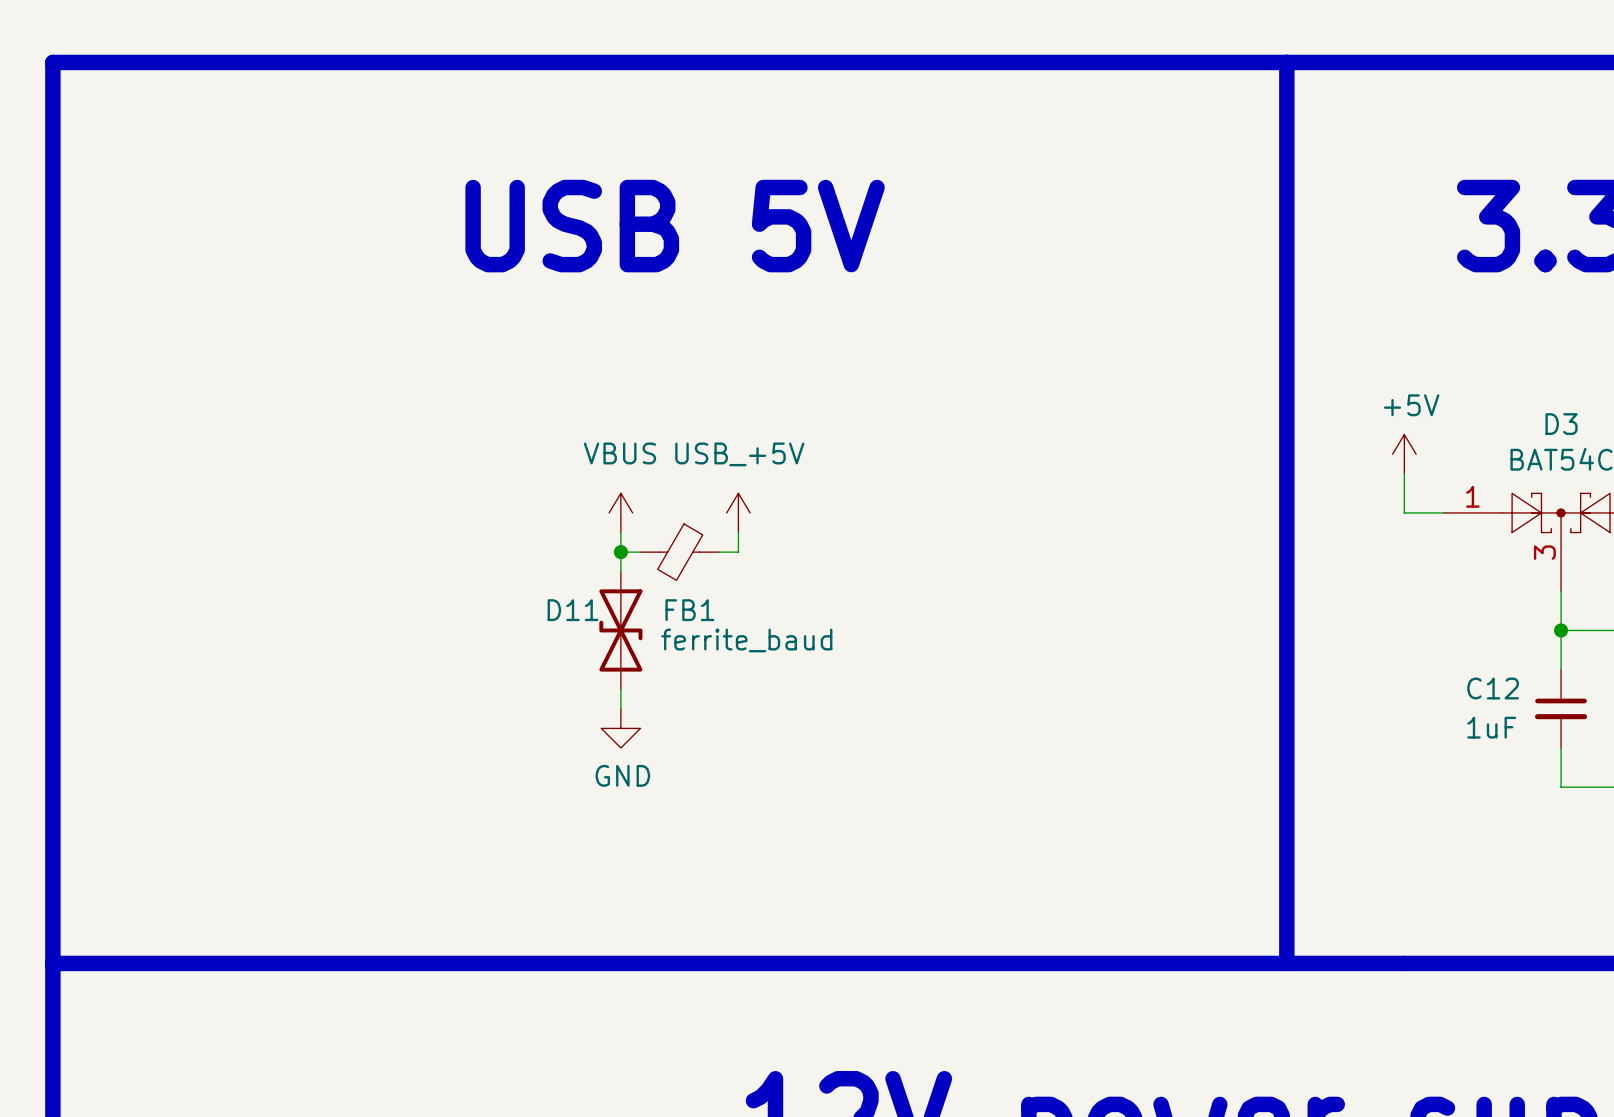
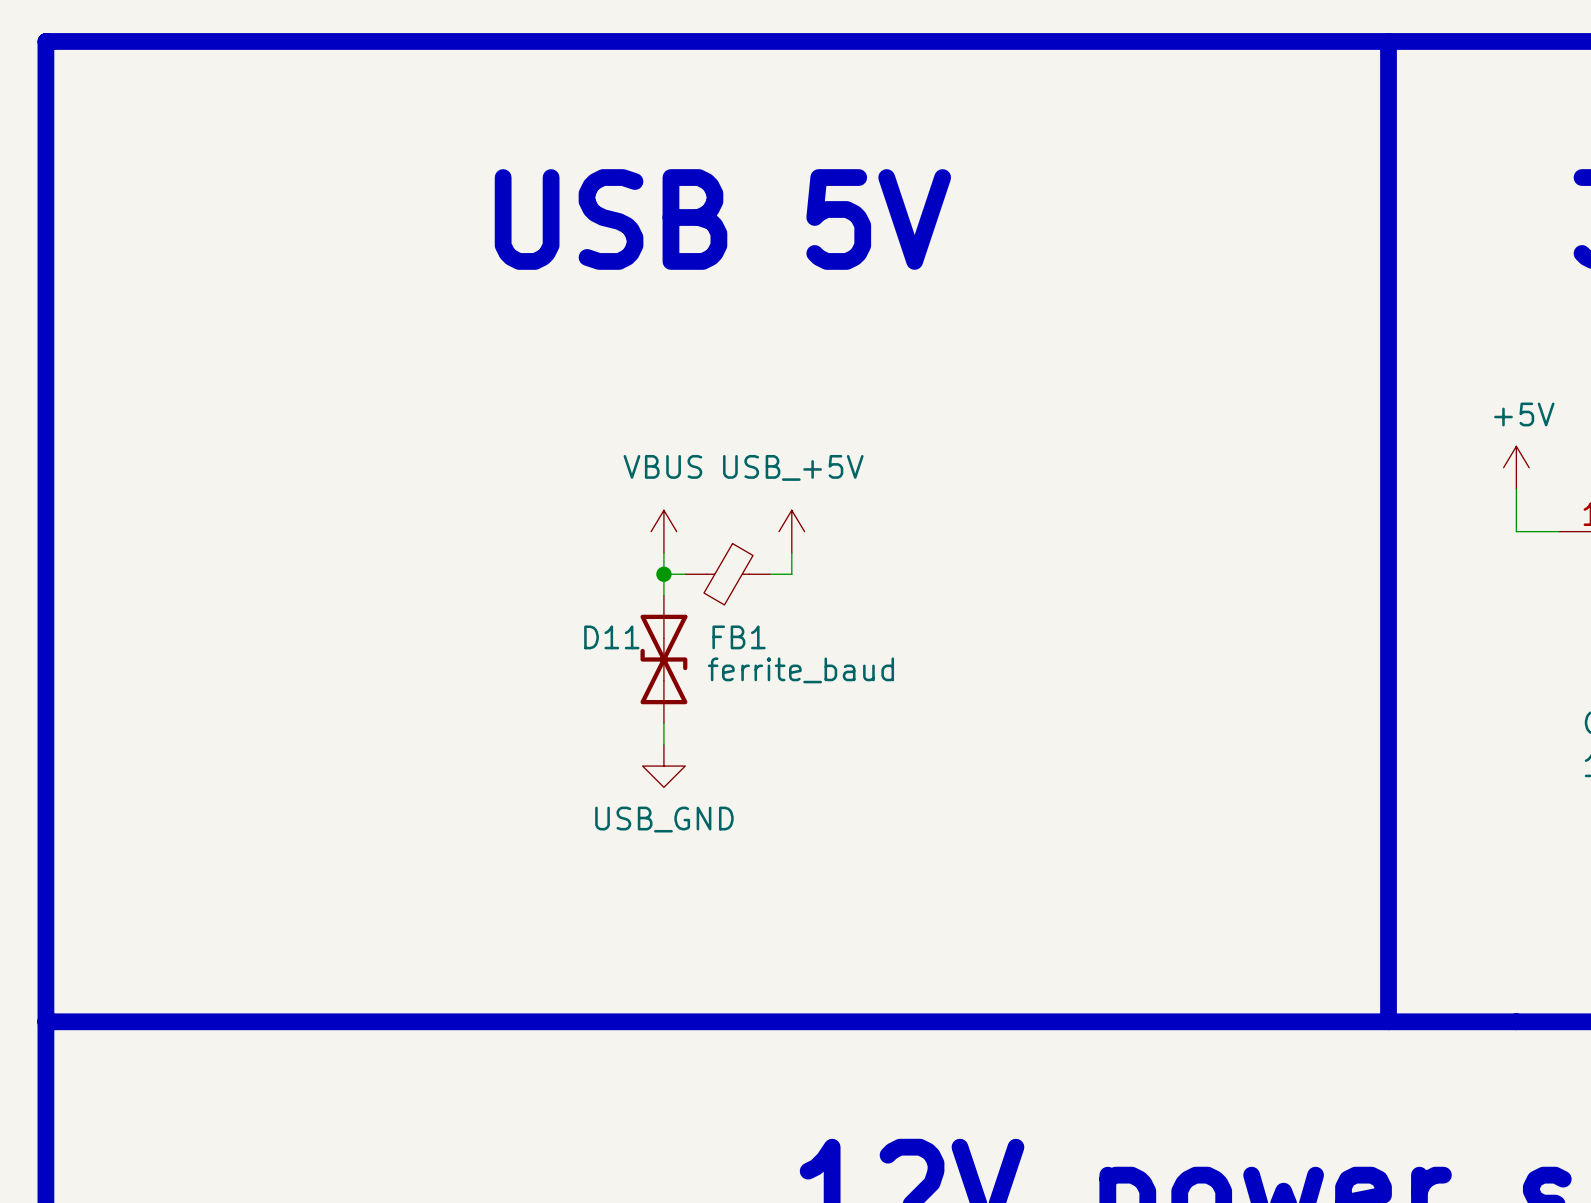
power symbol: GND (620, 728) -> USB_GND (663, 766)

